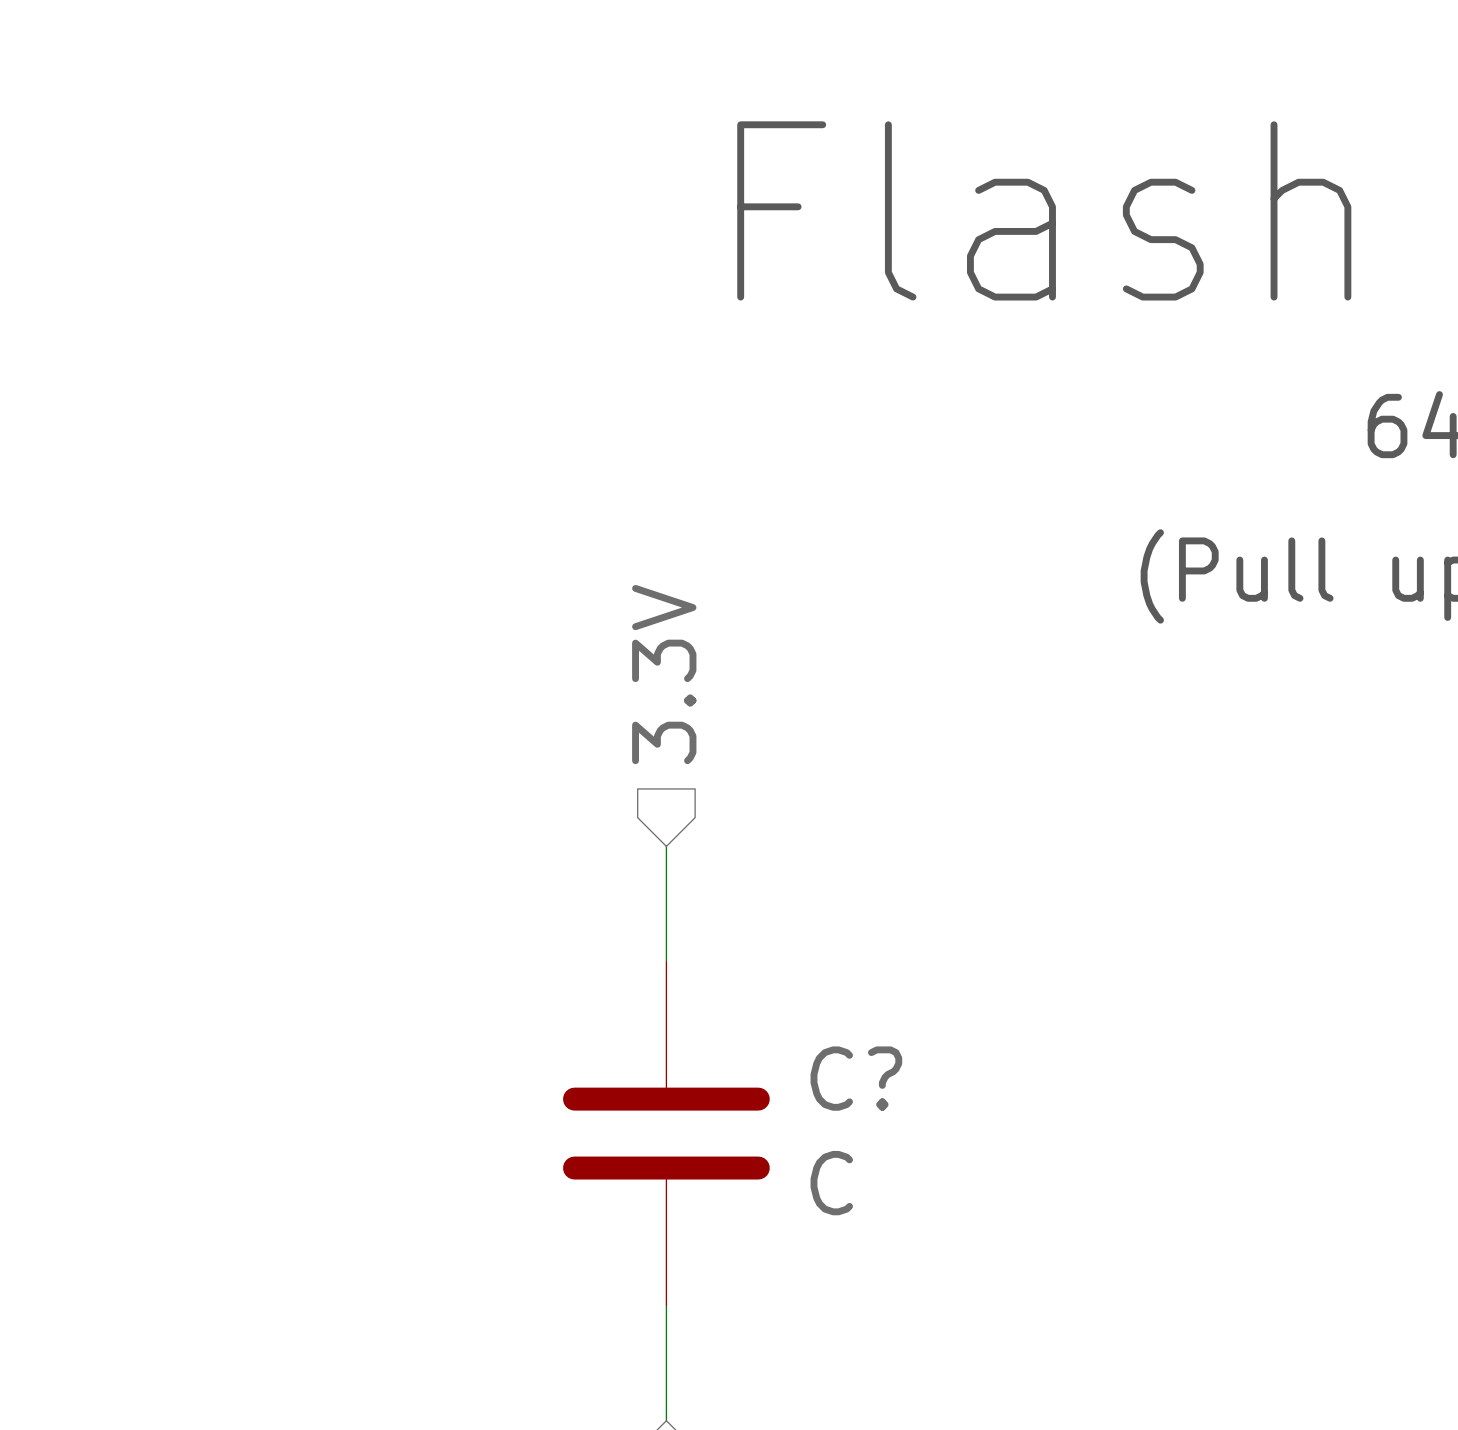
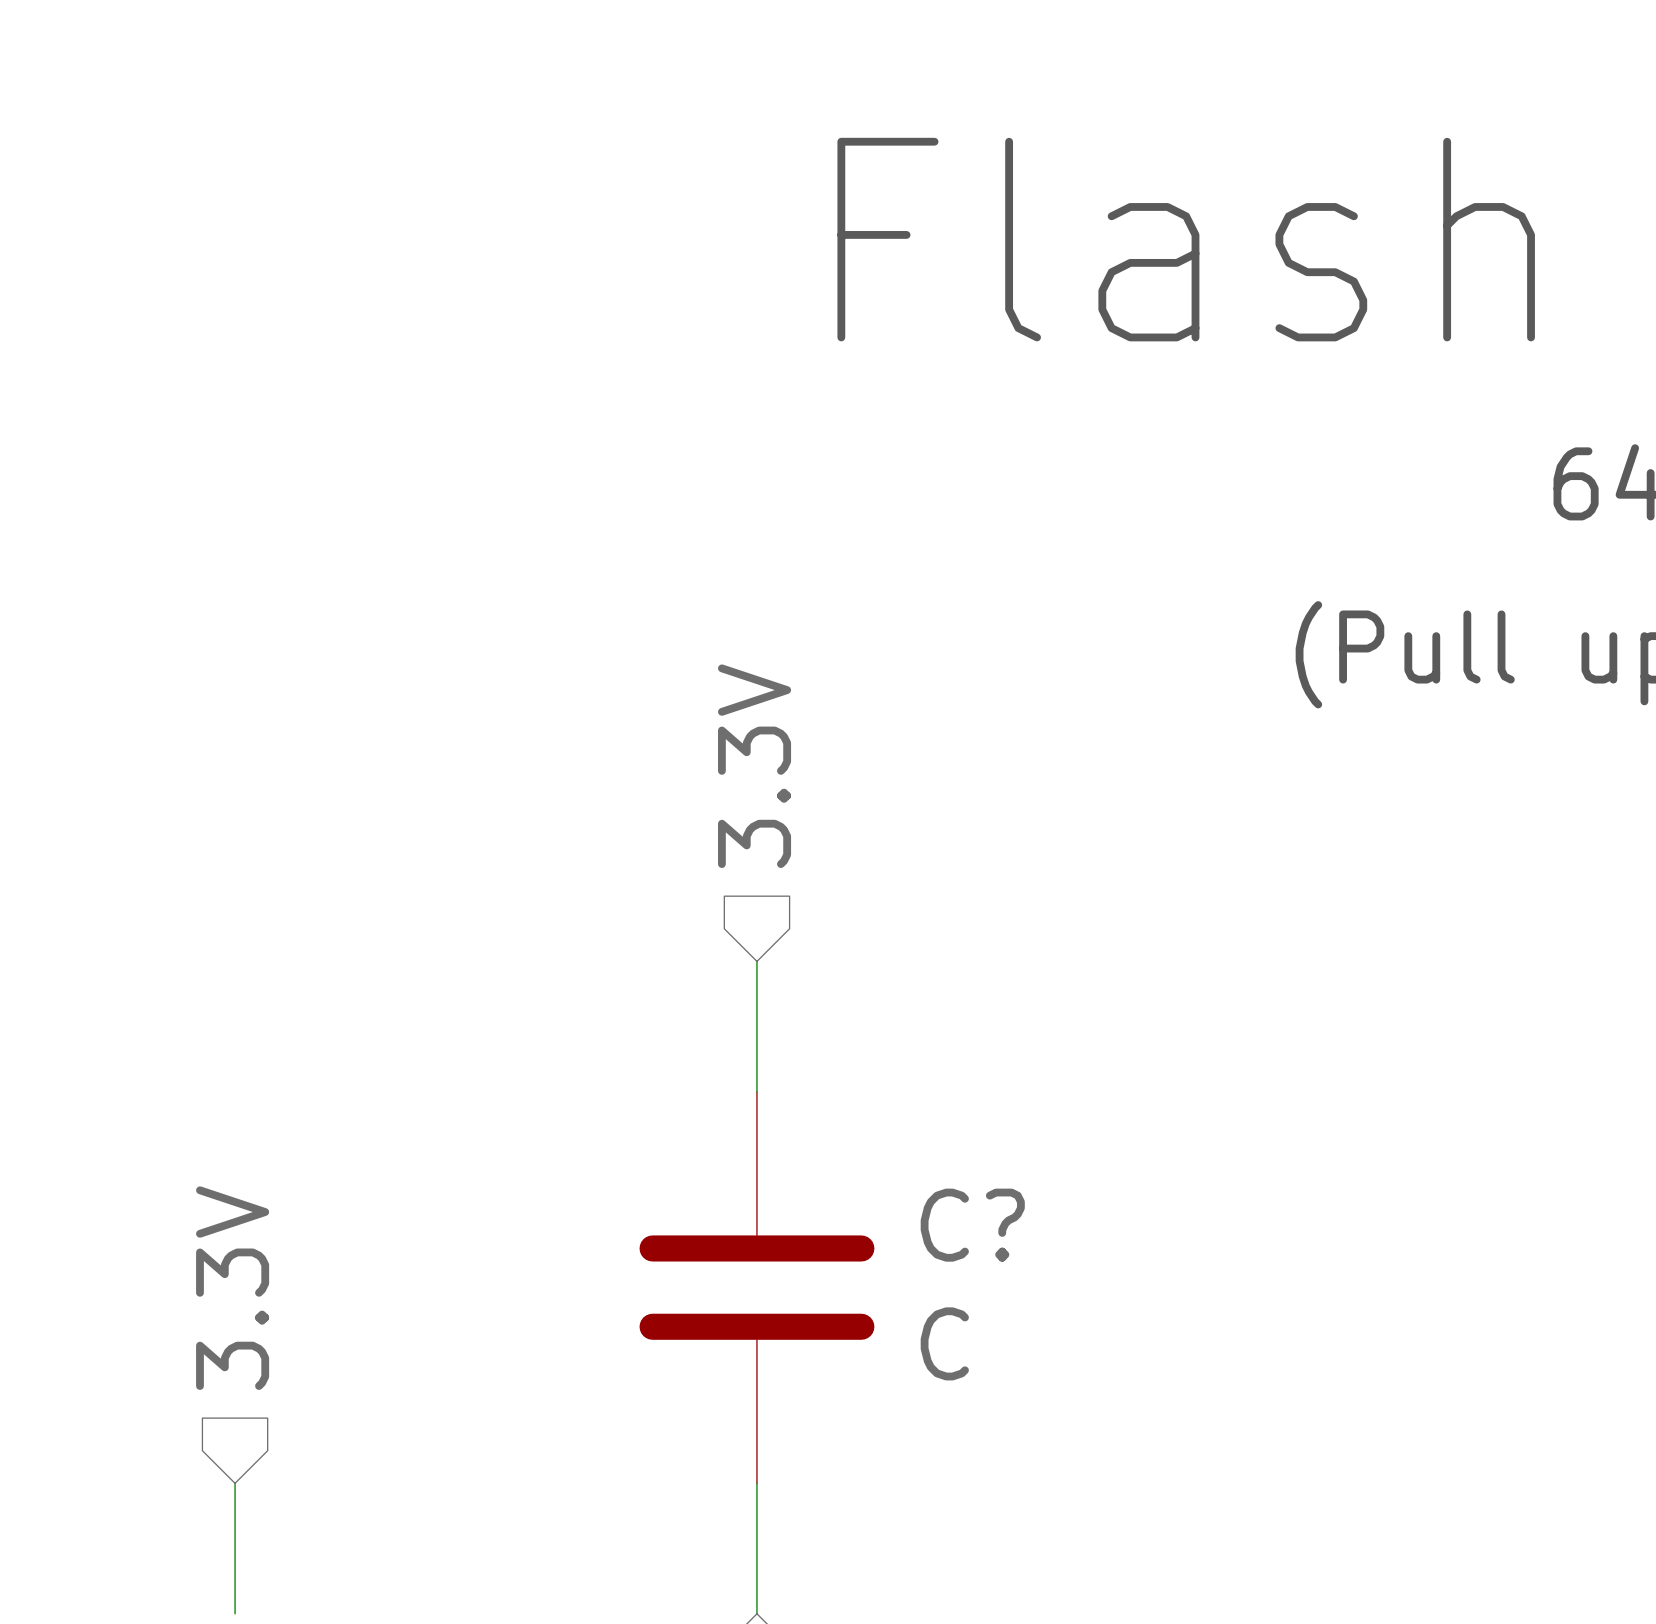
hierarchical label: none -> 3.3V (232, 1288)
wire: none -> (235, 1483) (235, 1613)

